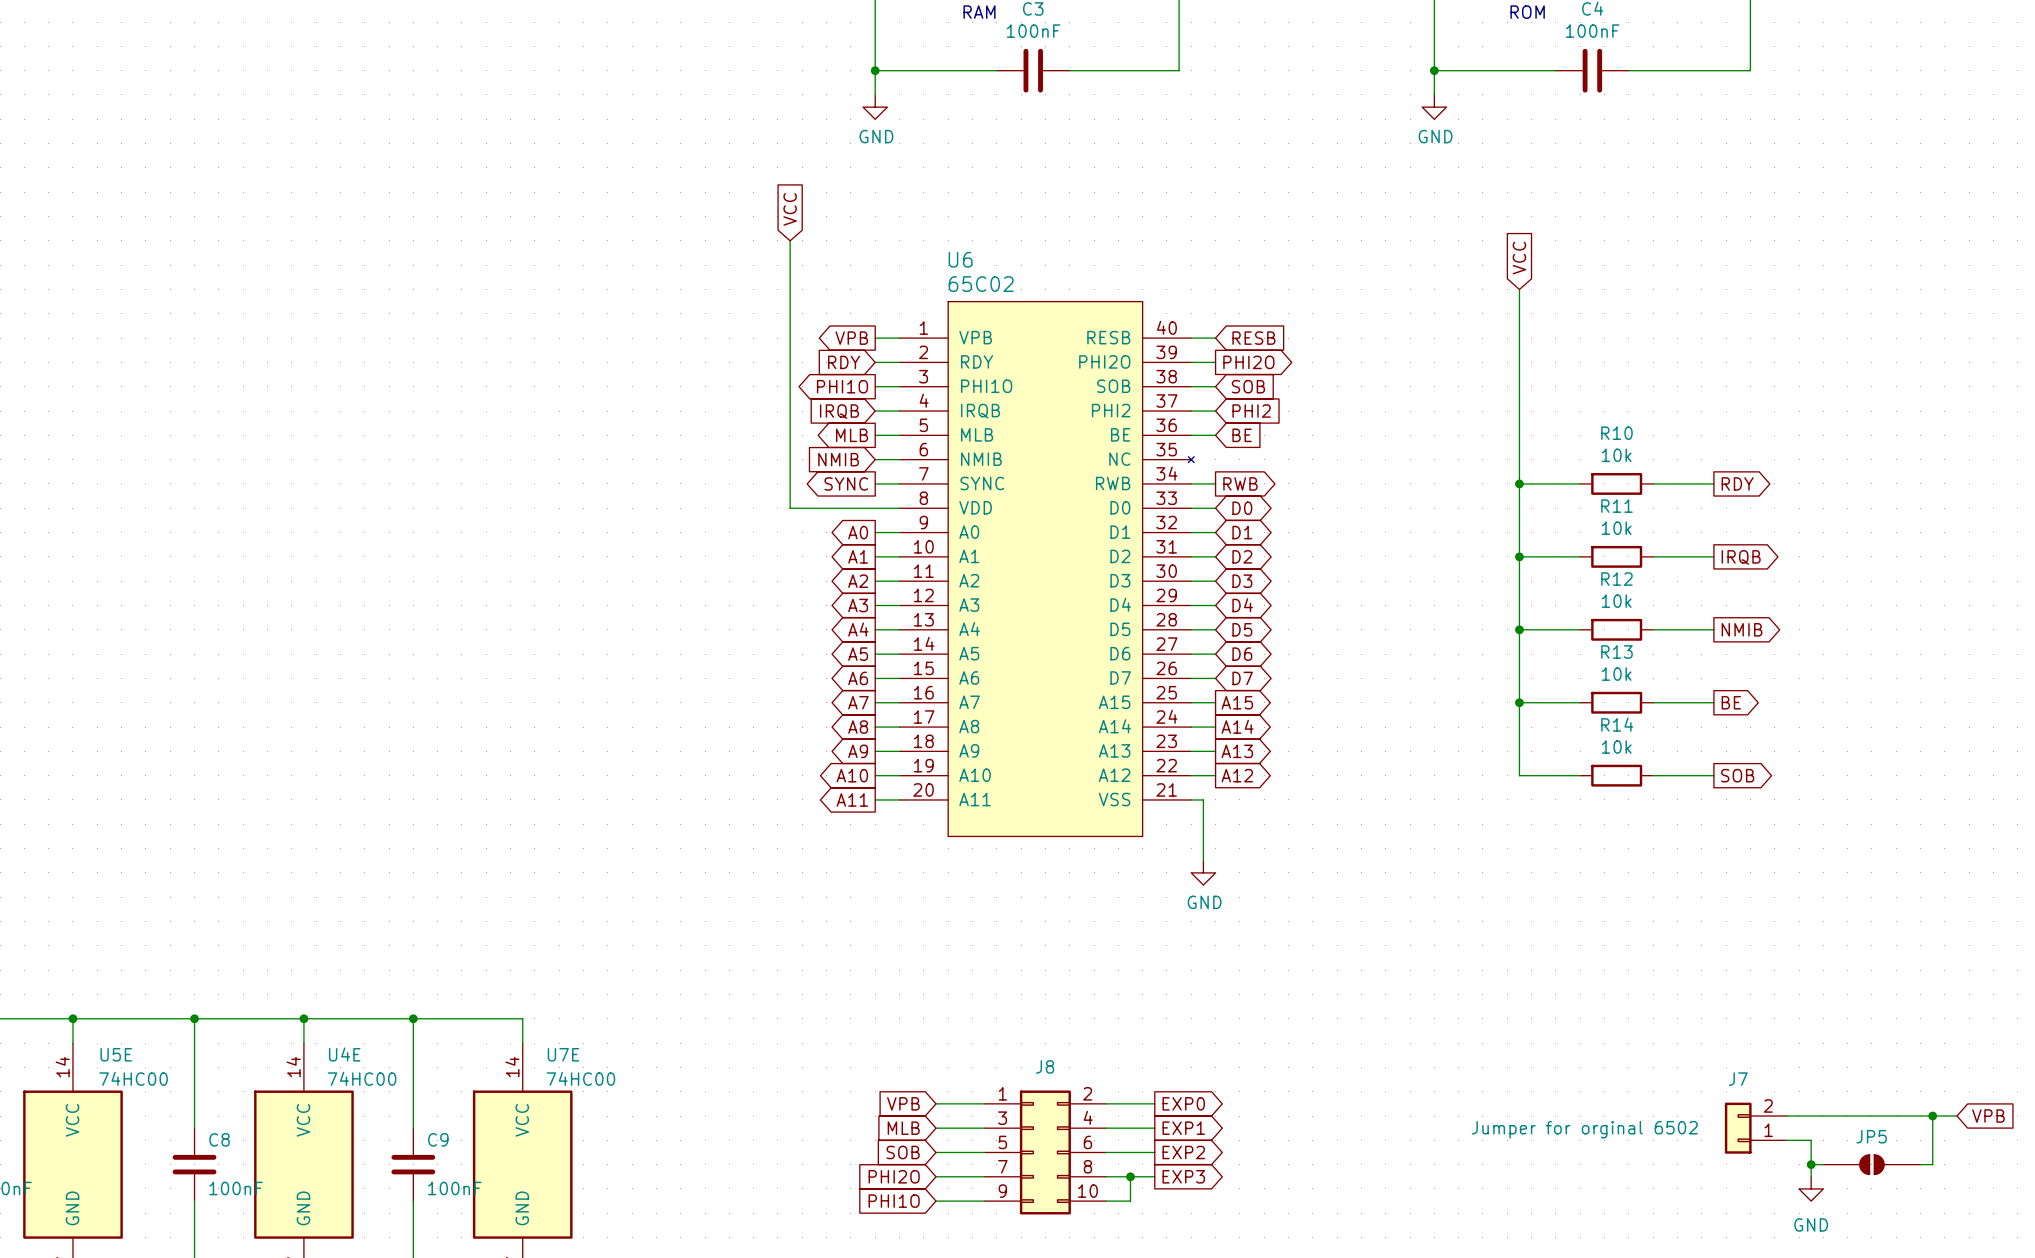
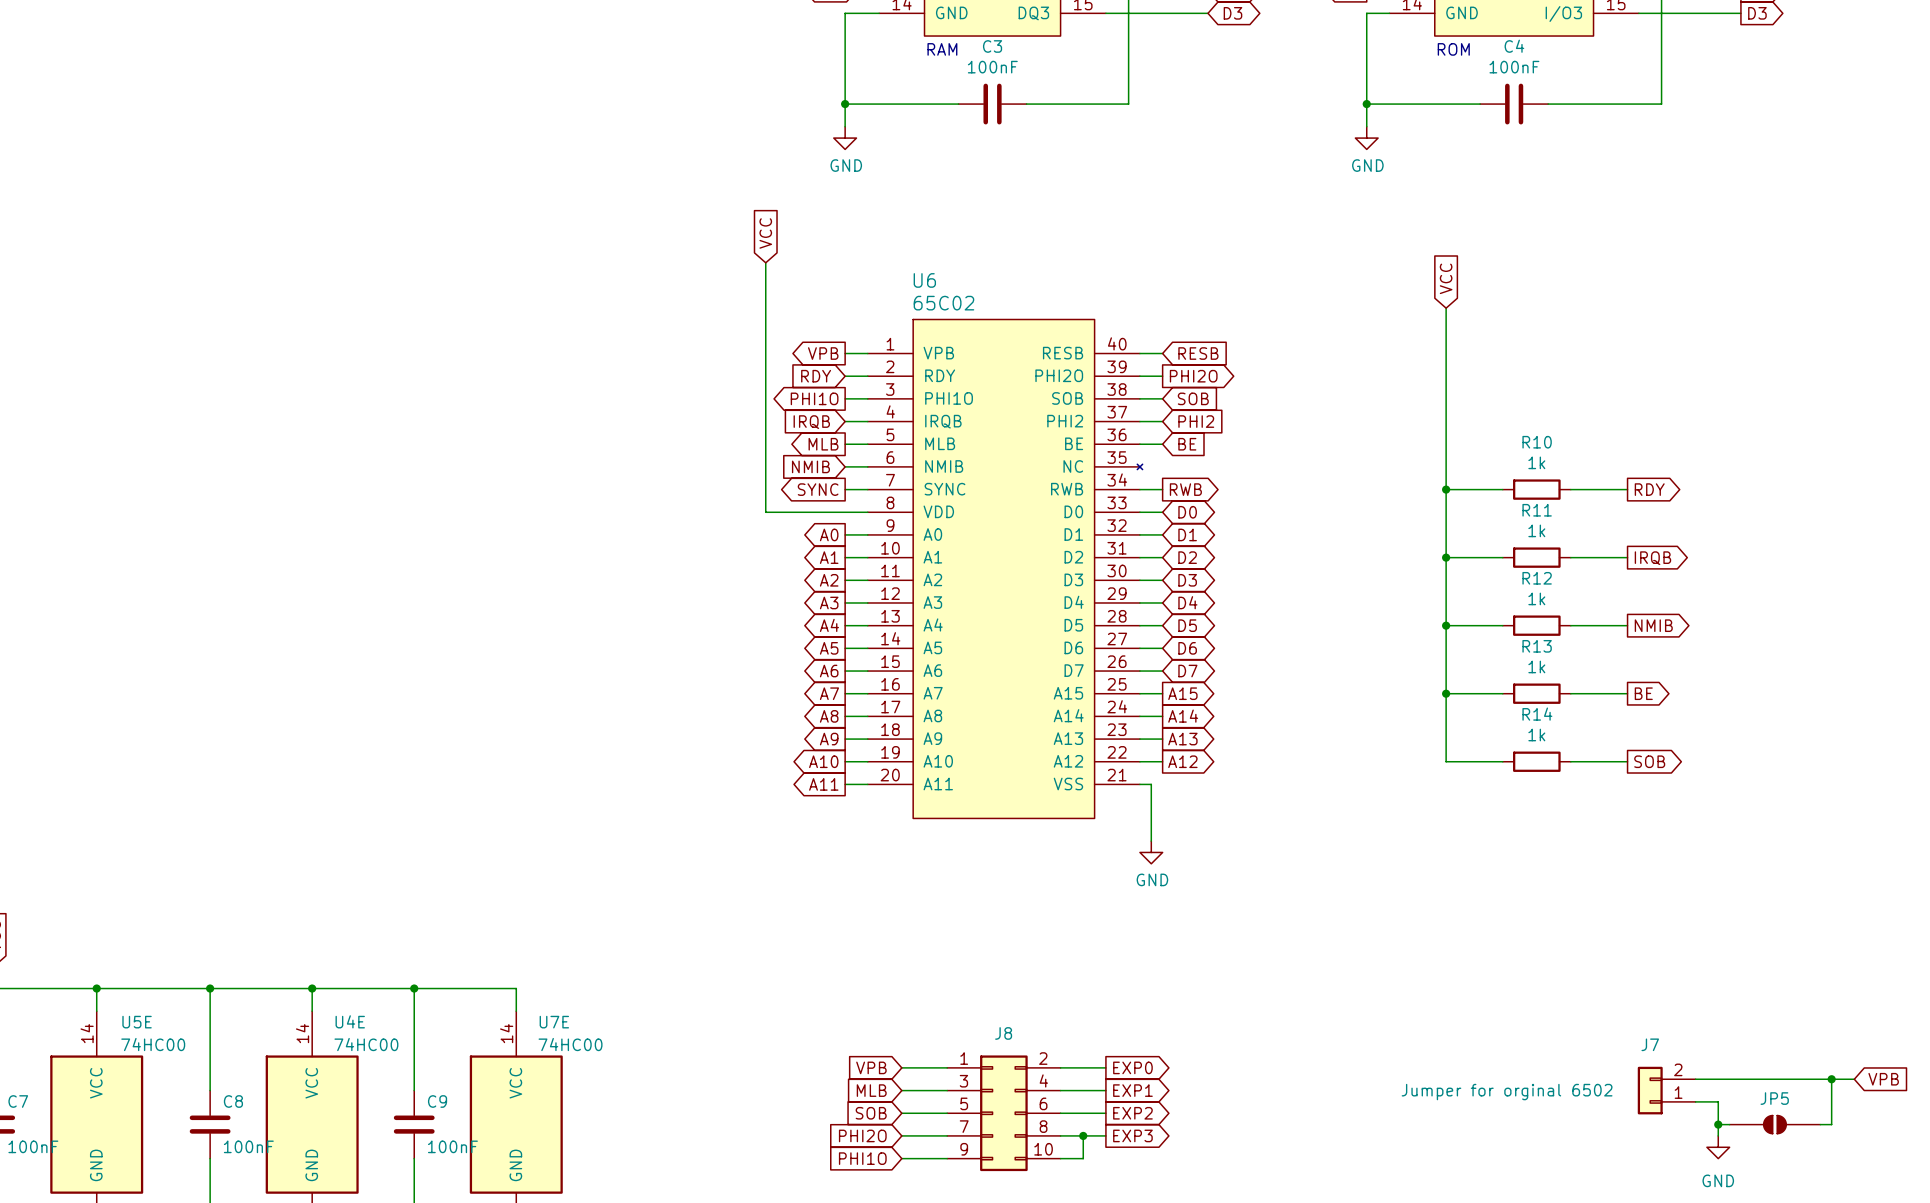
R10 value: 10k (1616, 455) -> 1k (1536, 462)
R11 value: 10k (1616, 528) -> 1k (1536, 530)
R12 value: 10k (1616, 601) -> 1k (1536, 598)
R13 value: 10k (1616, 674) -> 1k (1536, 666)
R14 value: 10k (1616, 747) -> 1k (1536, 735)

